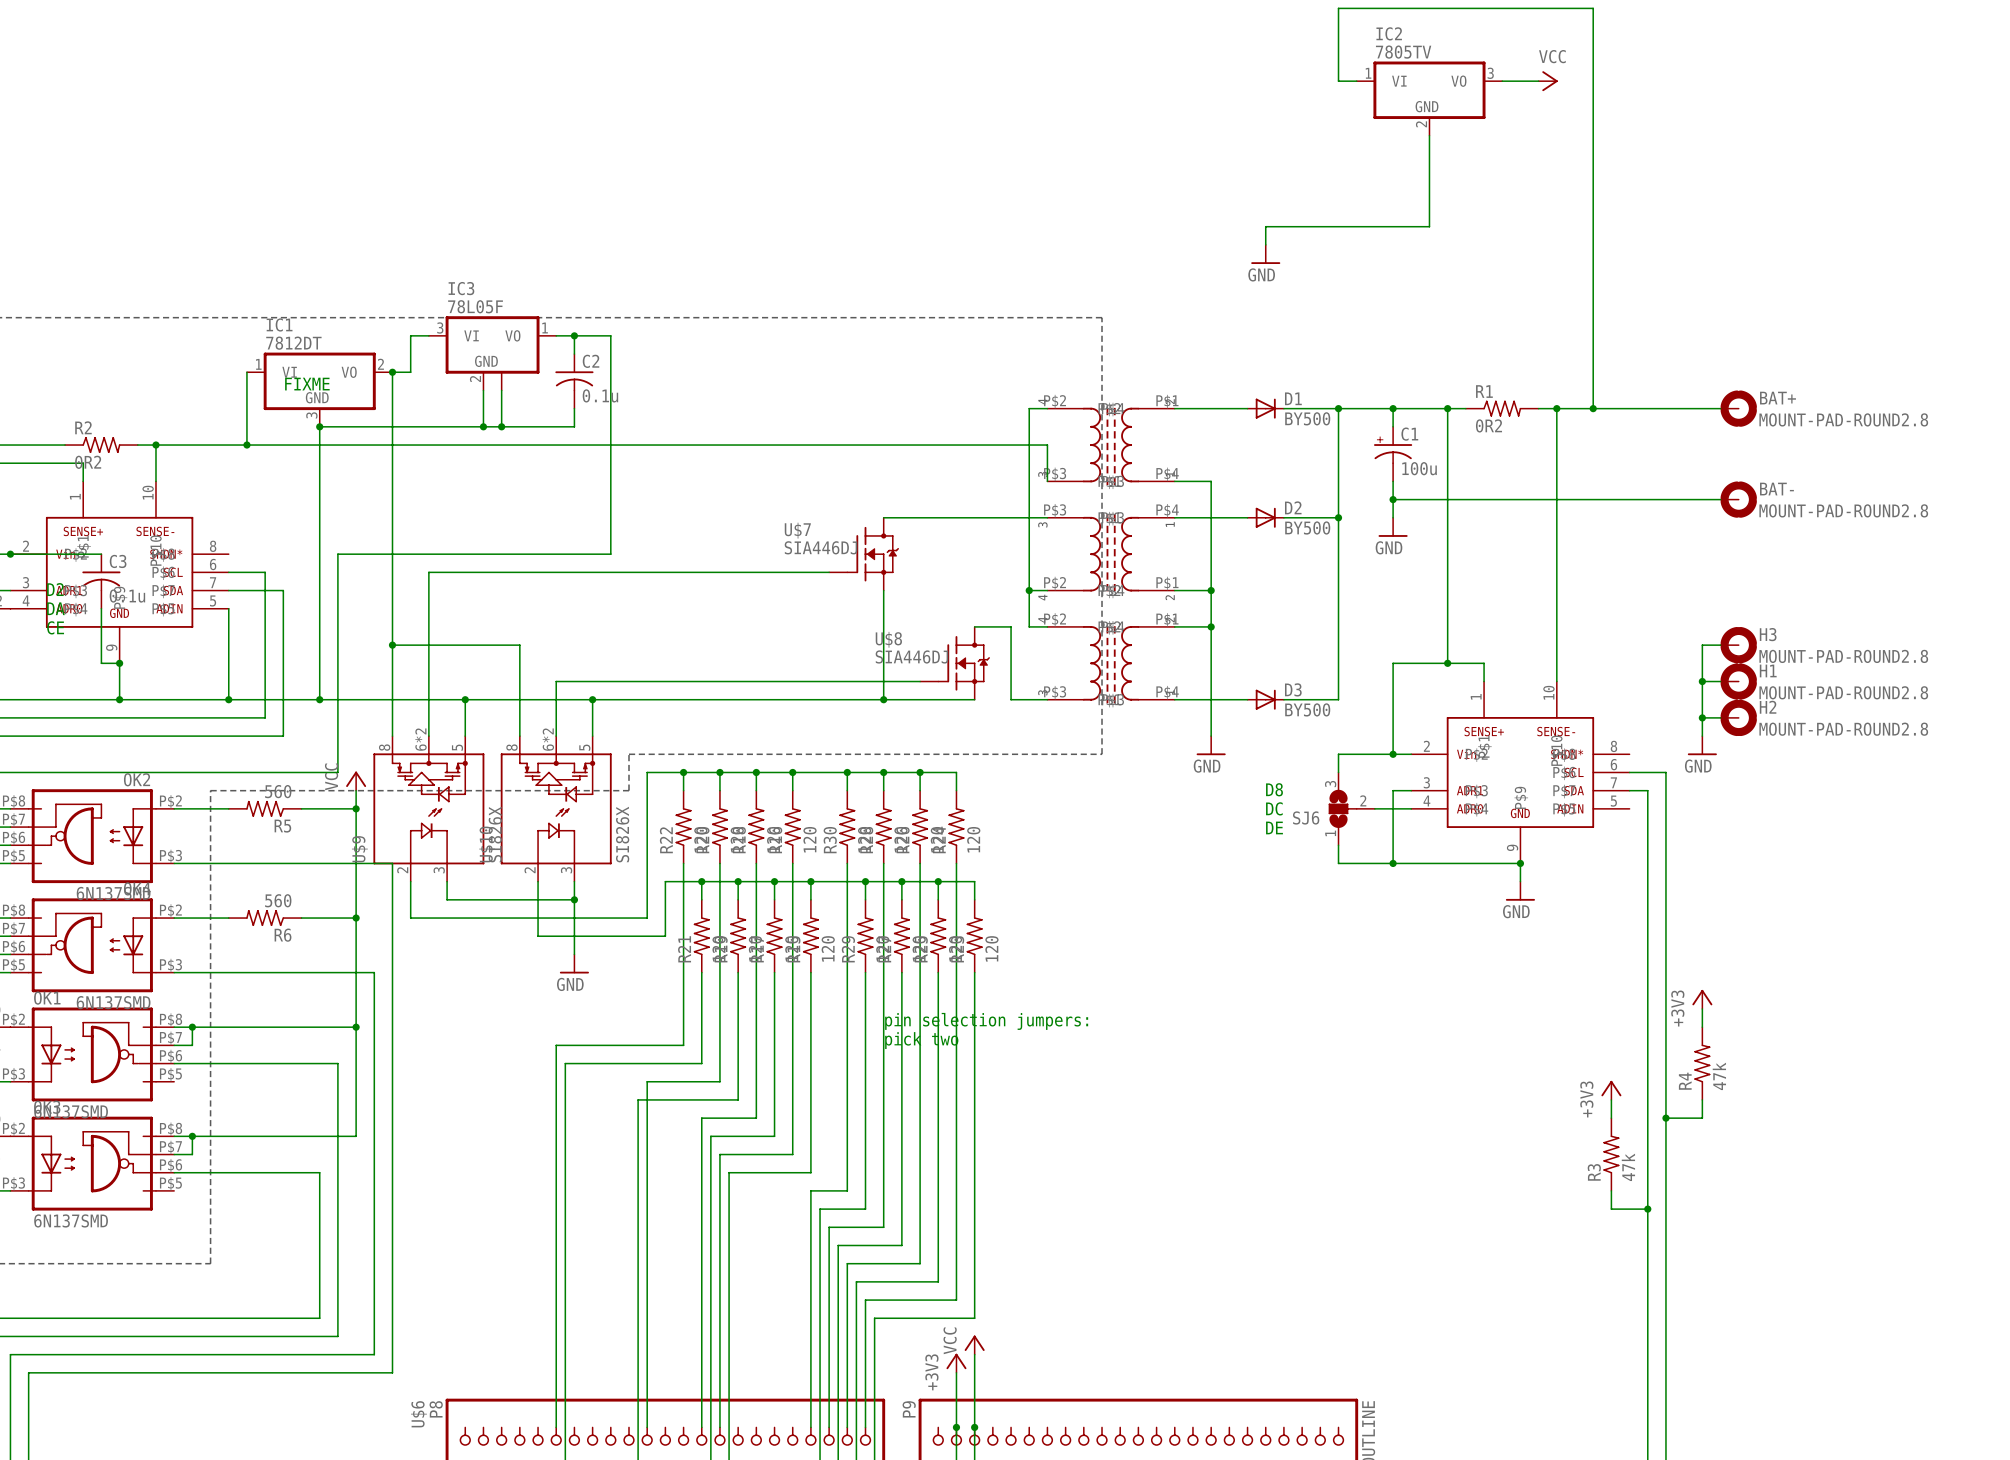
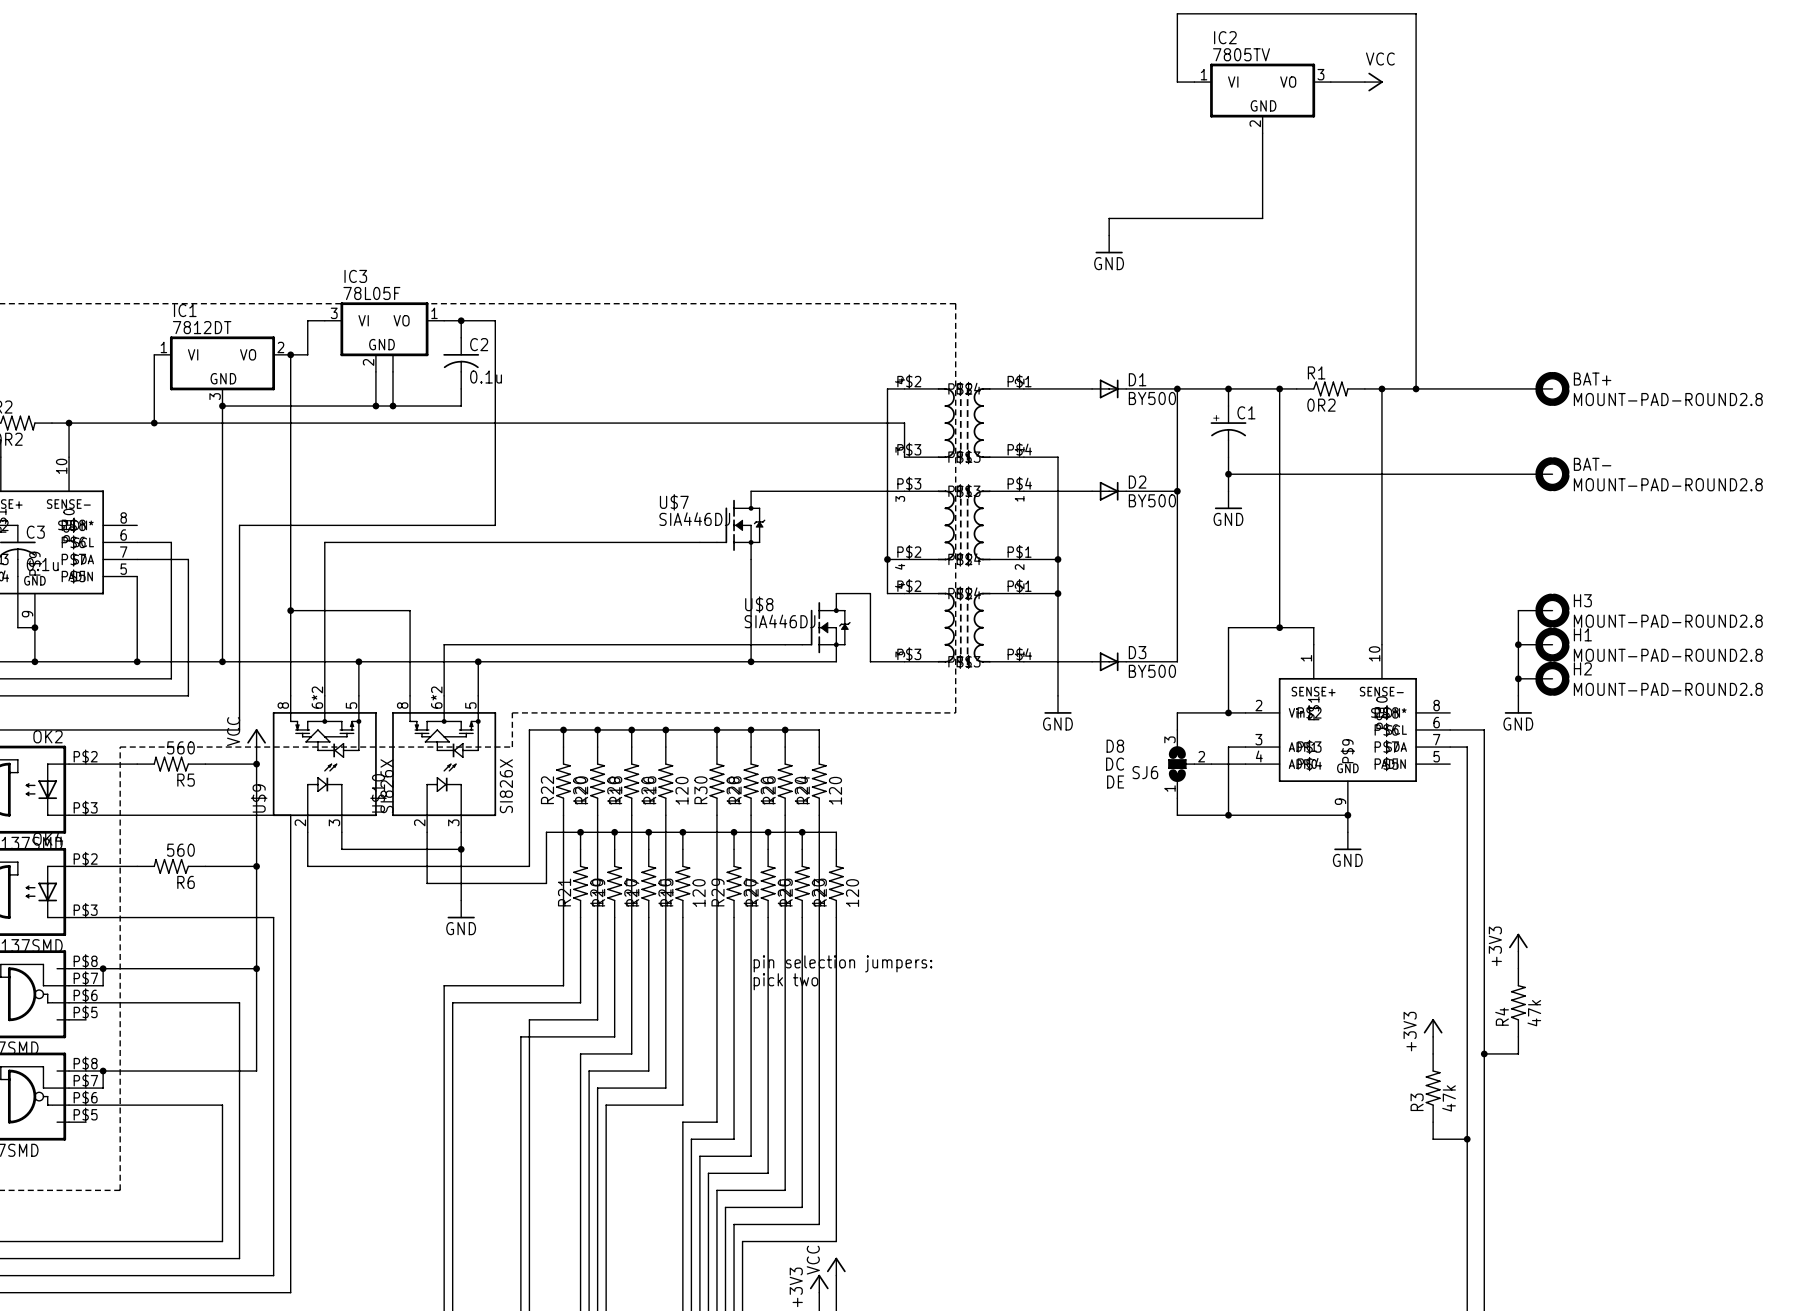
text: FIXME (307, 384) -> none
C1 value: 100u (1419, 468) -> none

